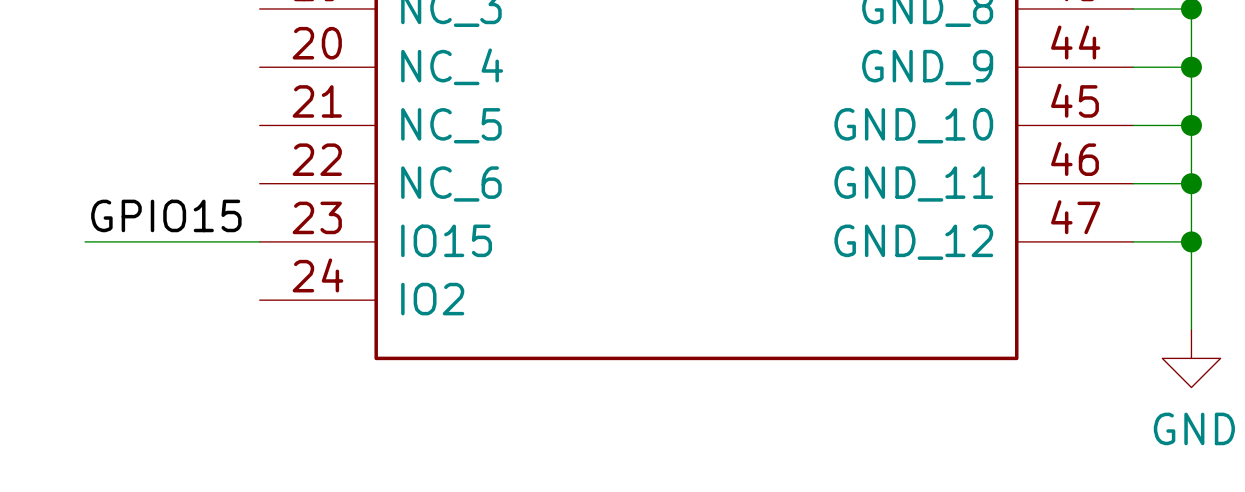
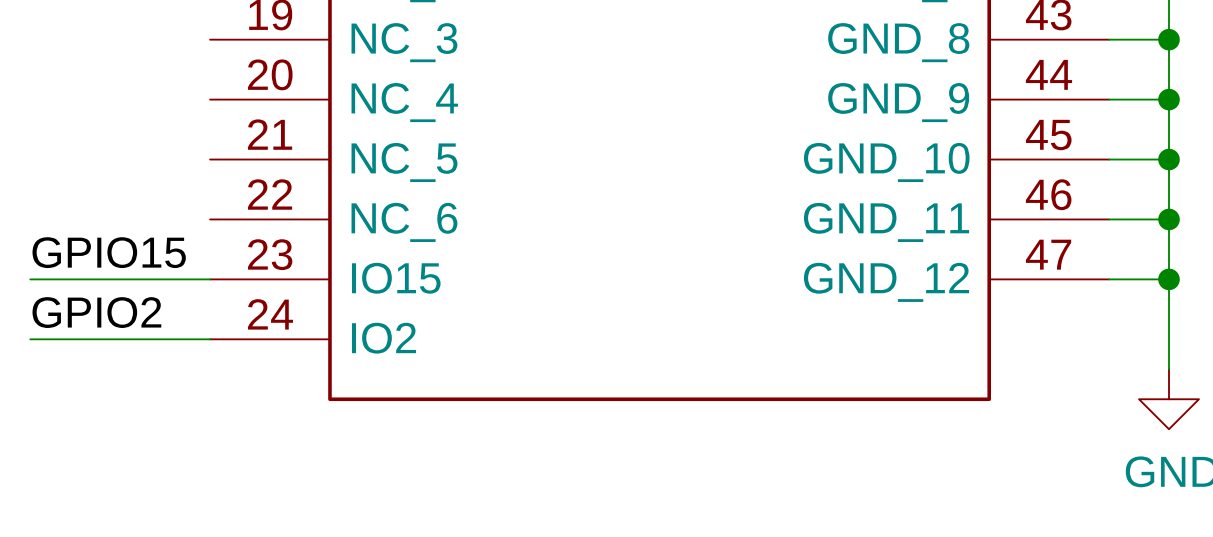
label: none -> GPIO2 (96, 312)
wire: none -> (30, 339) (210, 339)

